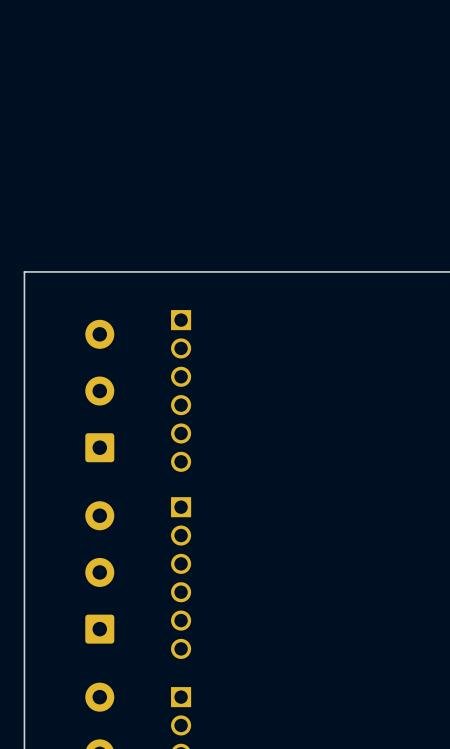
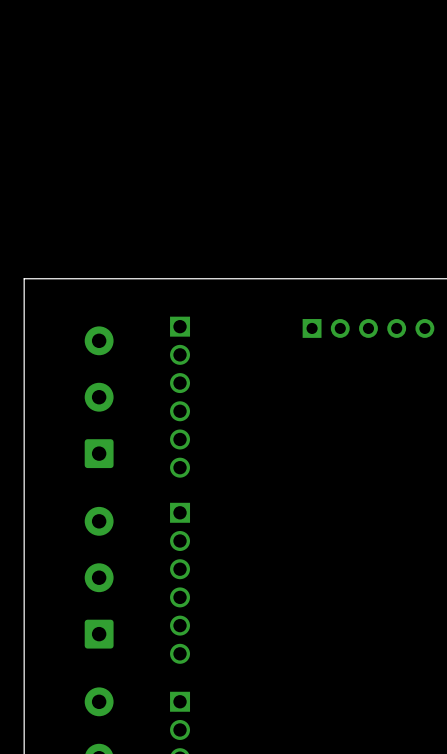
part: none -> (368, 328)

